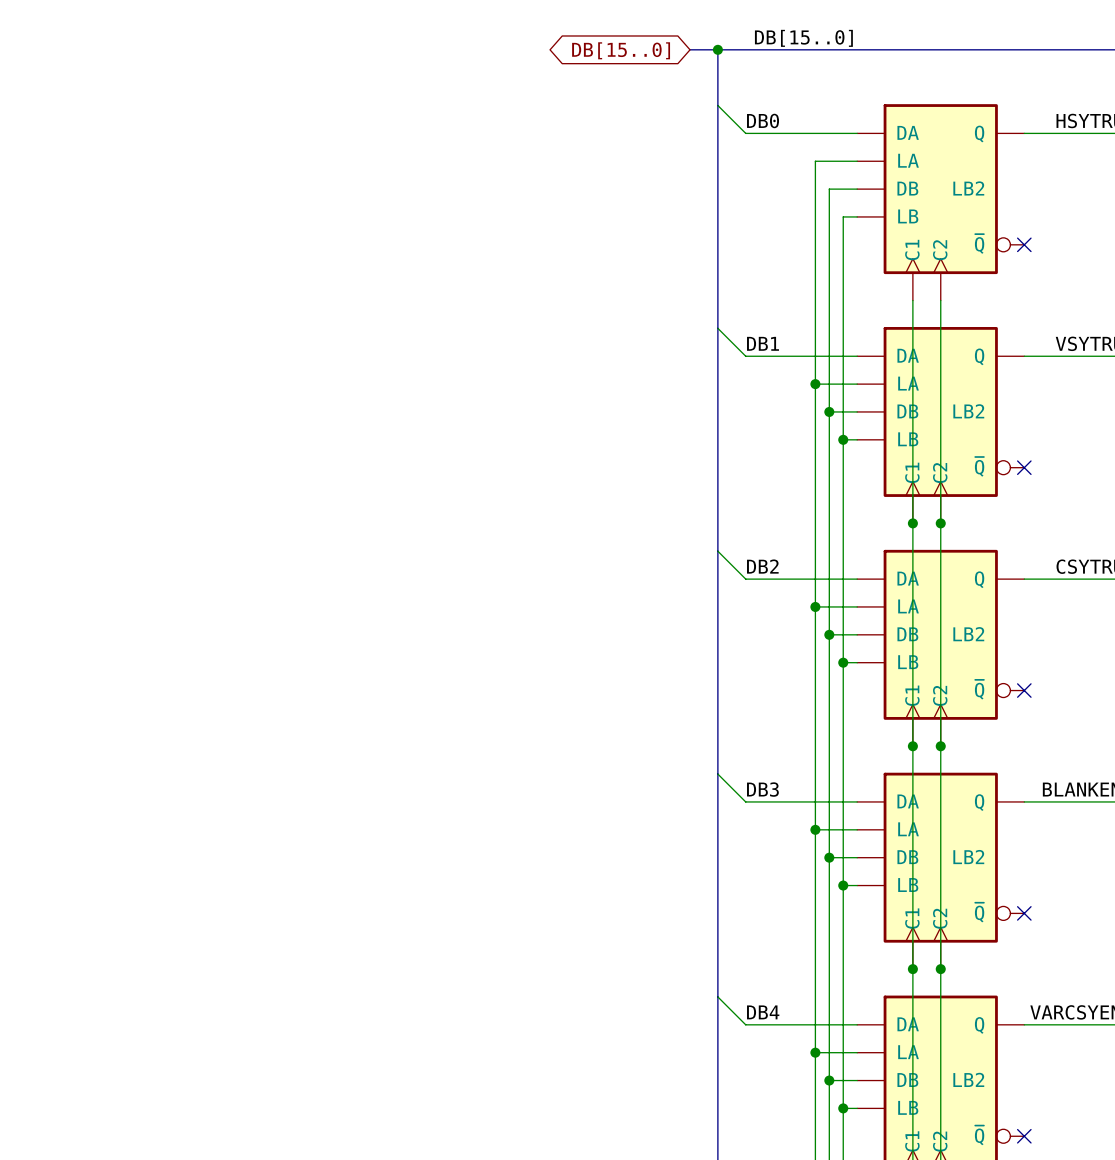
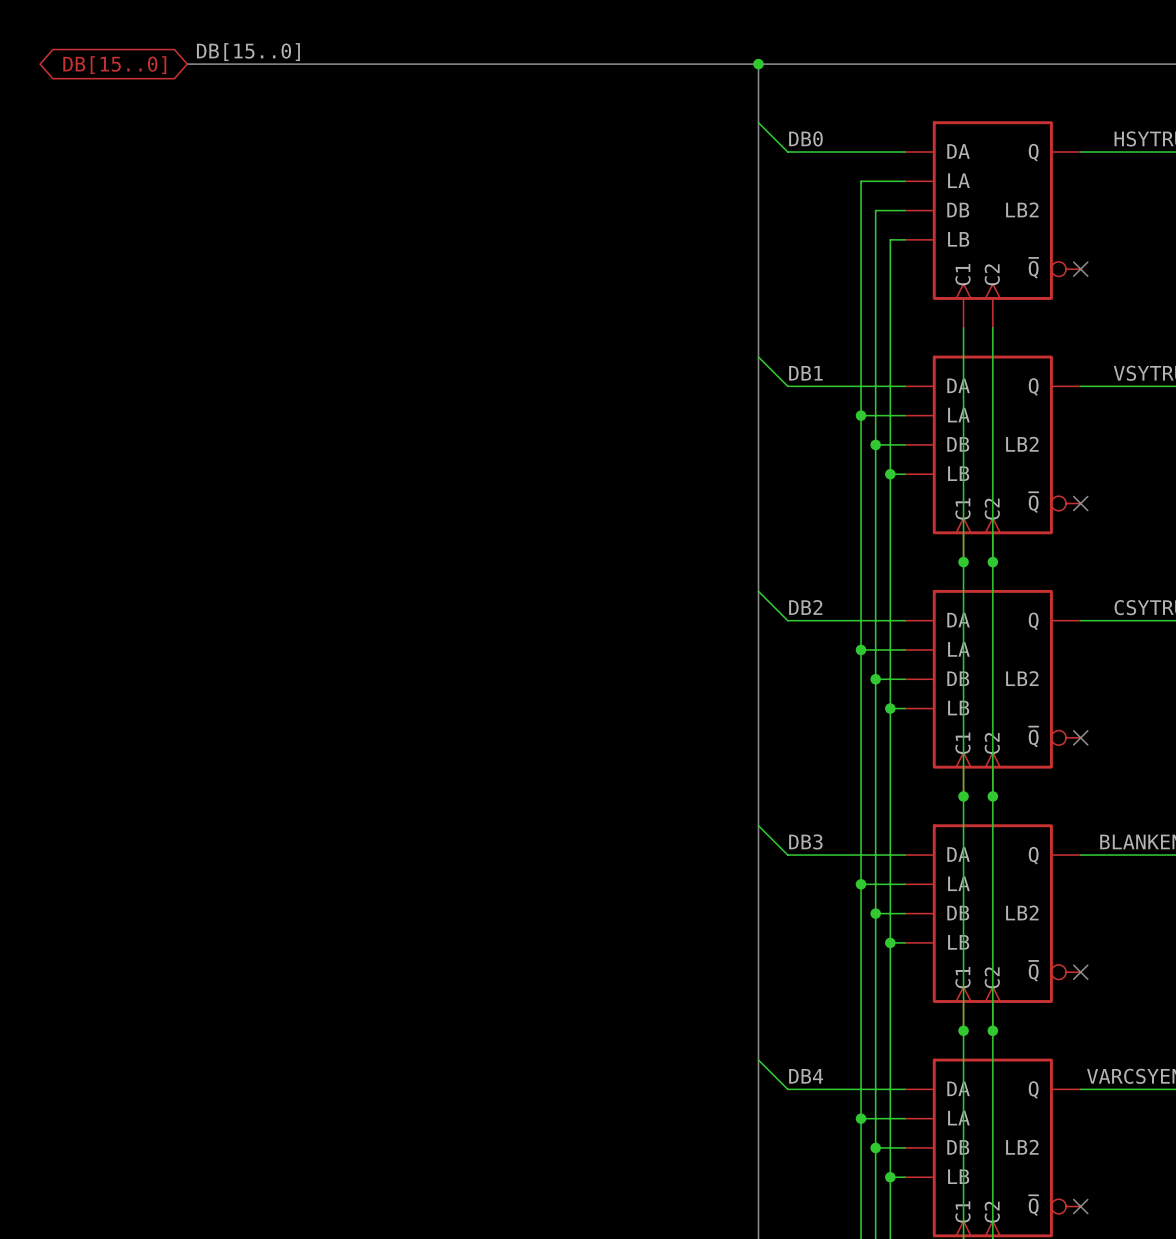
label: none -> DB[15..0] (248, 52)
label: DB[15..0] (803, 38) -> none
bus: none -> (187, 64) (729, 64)
global label: none -> DB[15..0] (114, 65)
global label: DB[15..0] (621, 50) -> none

